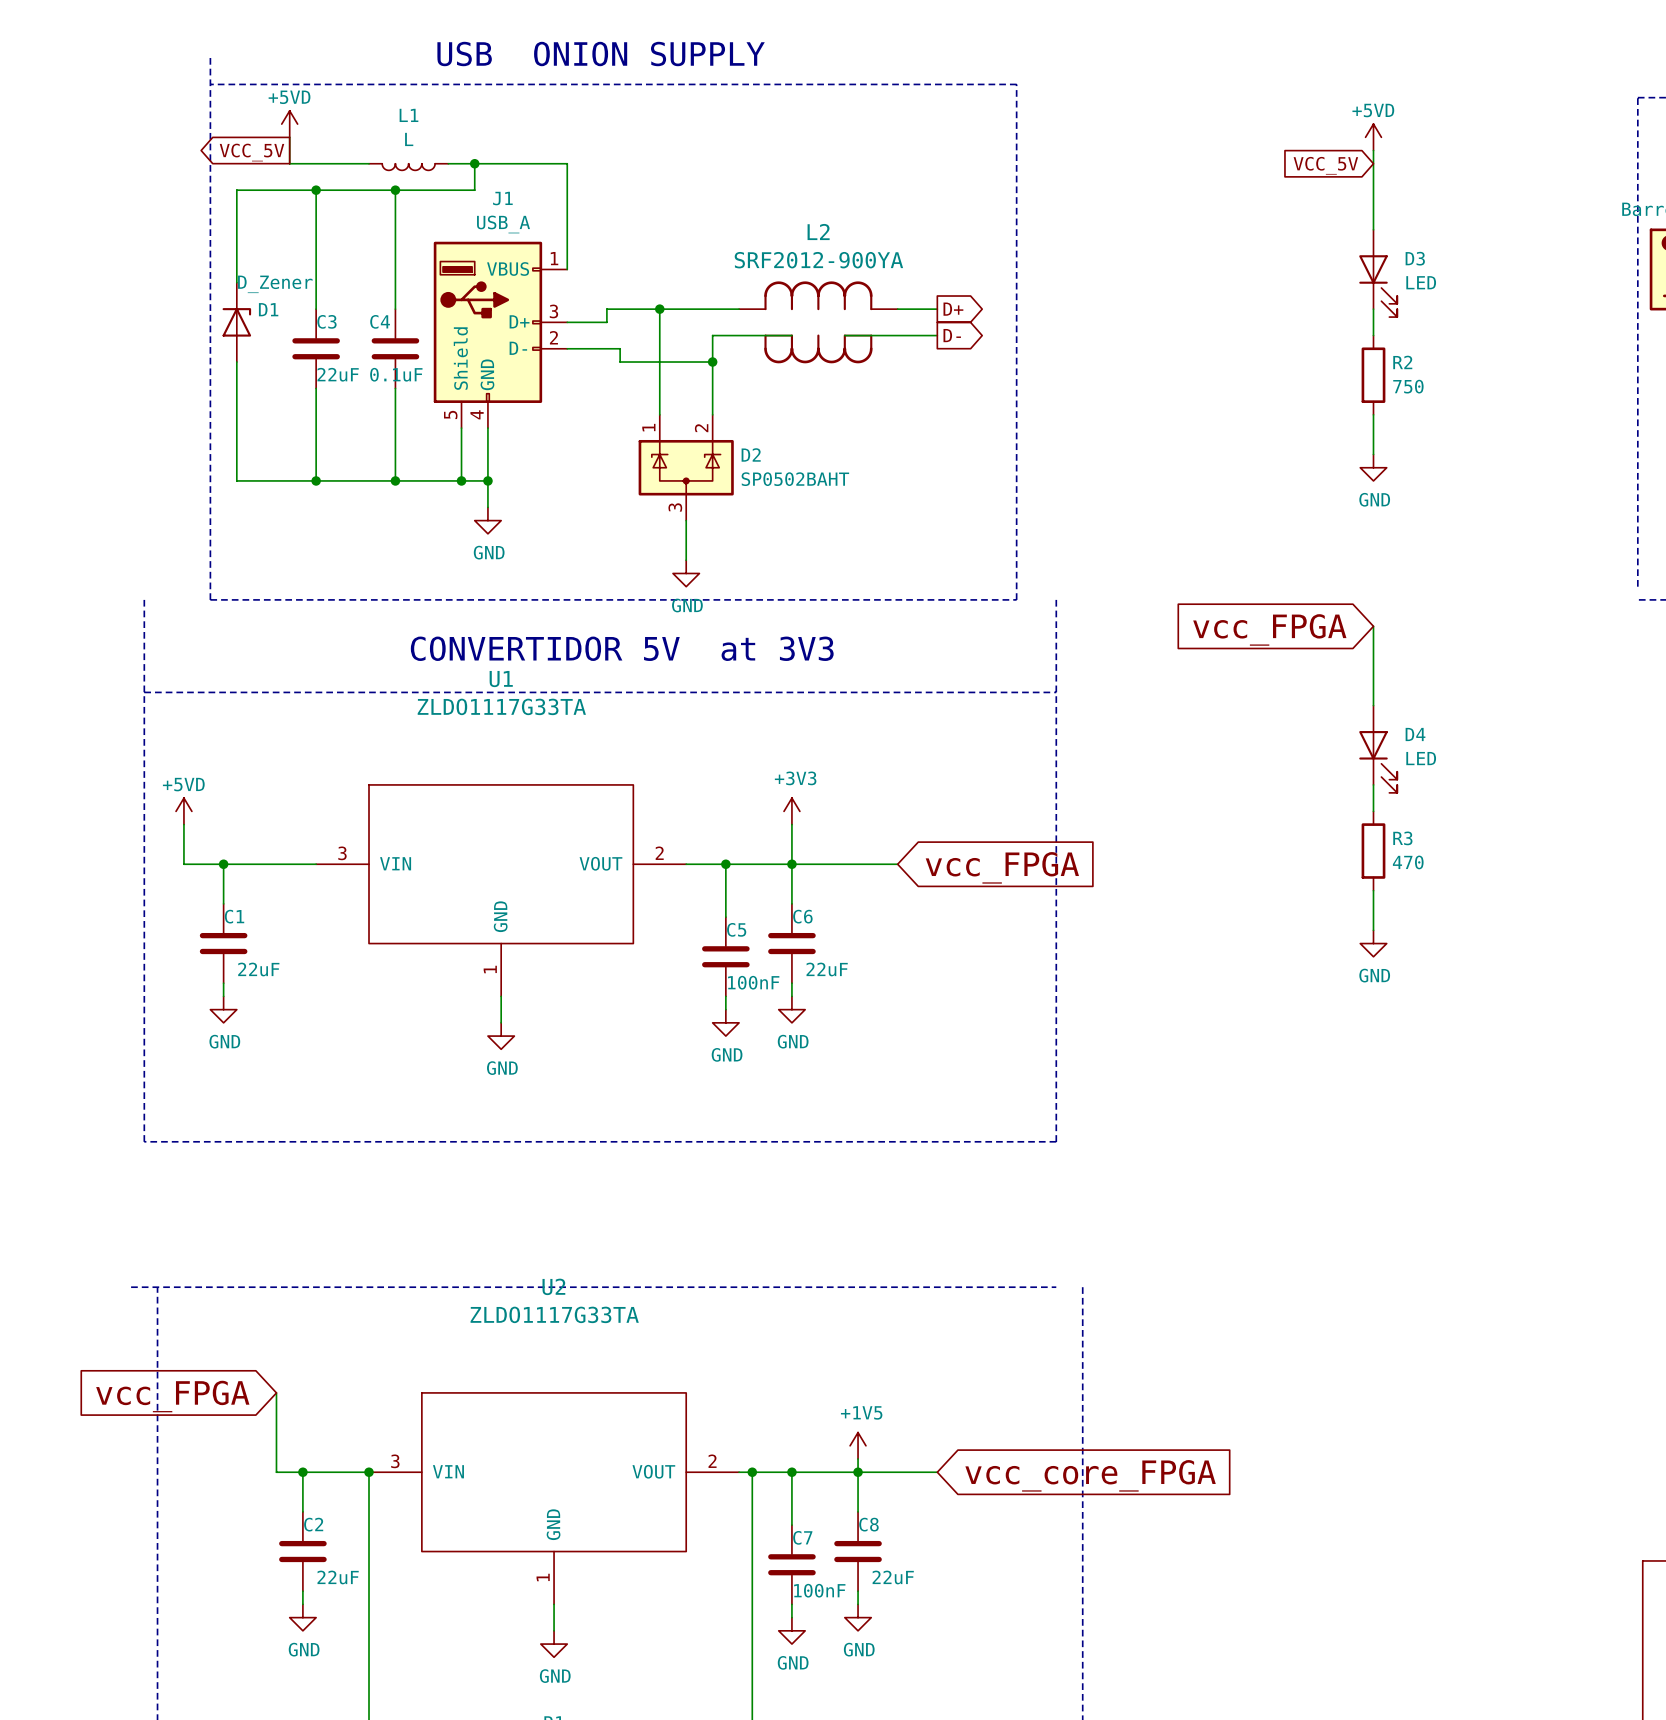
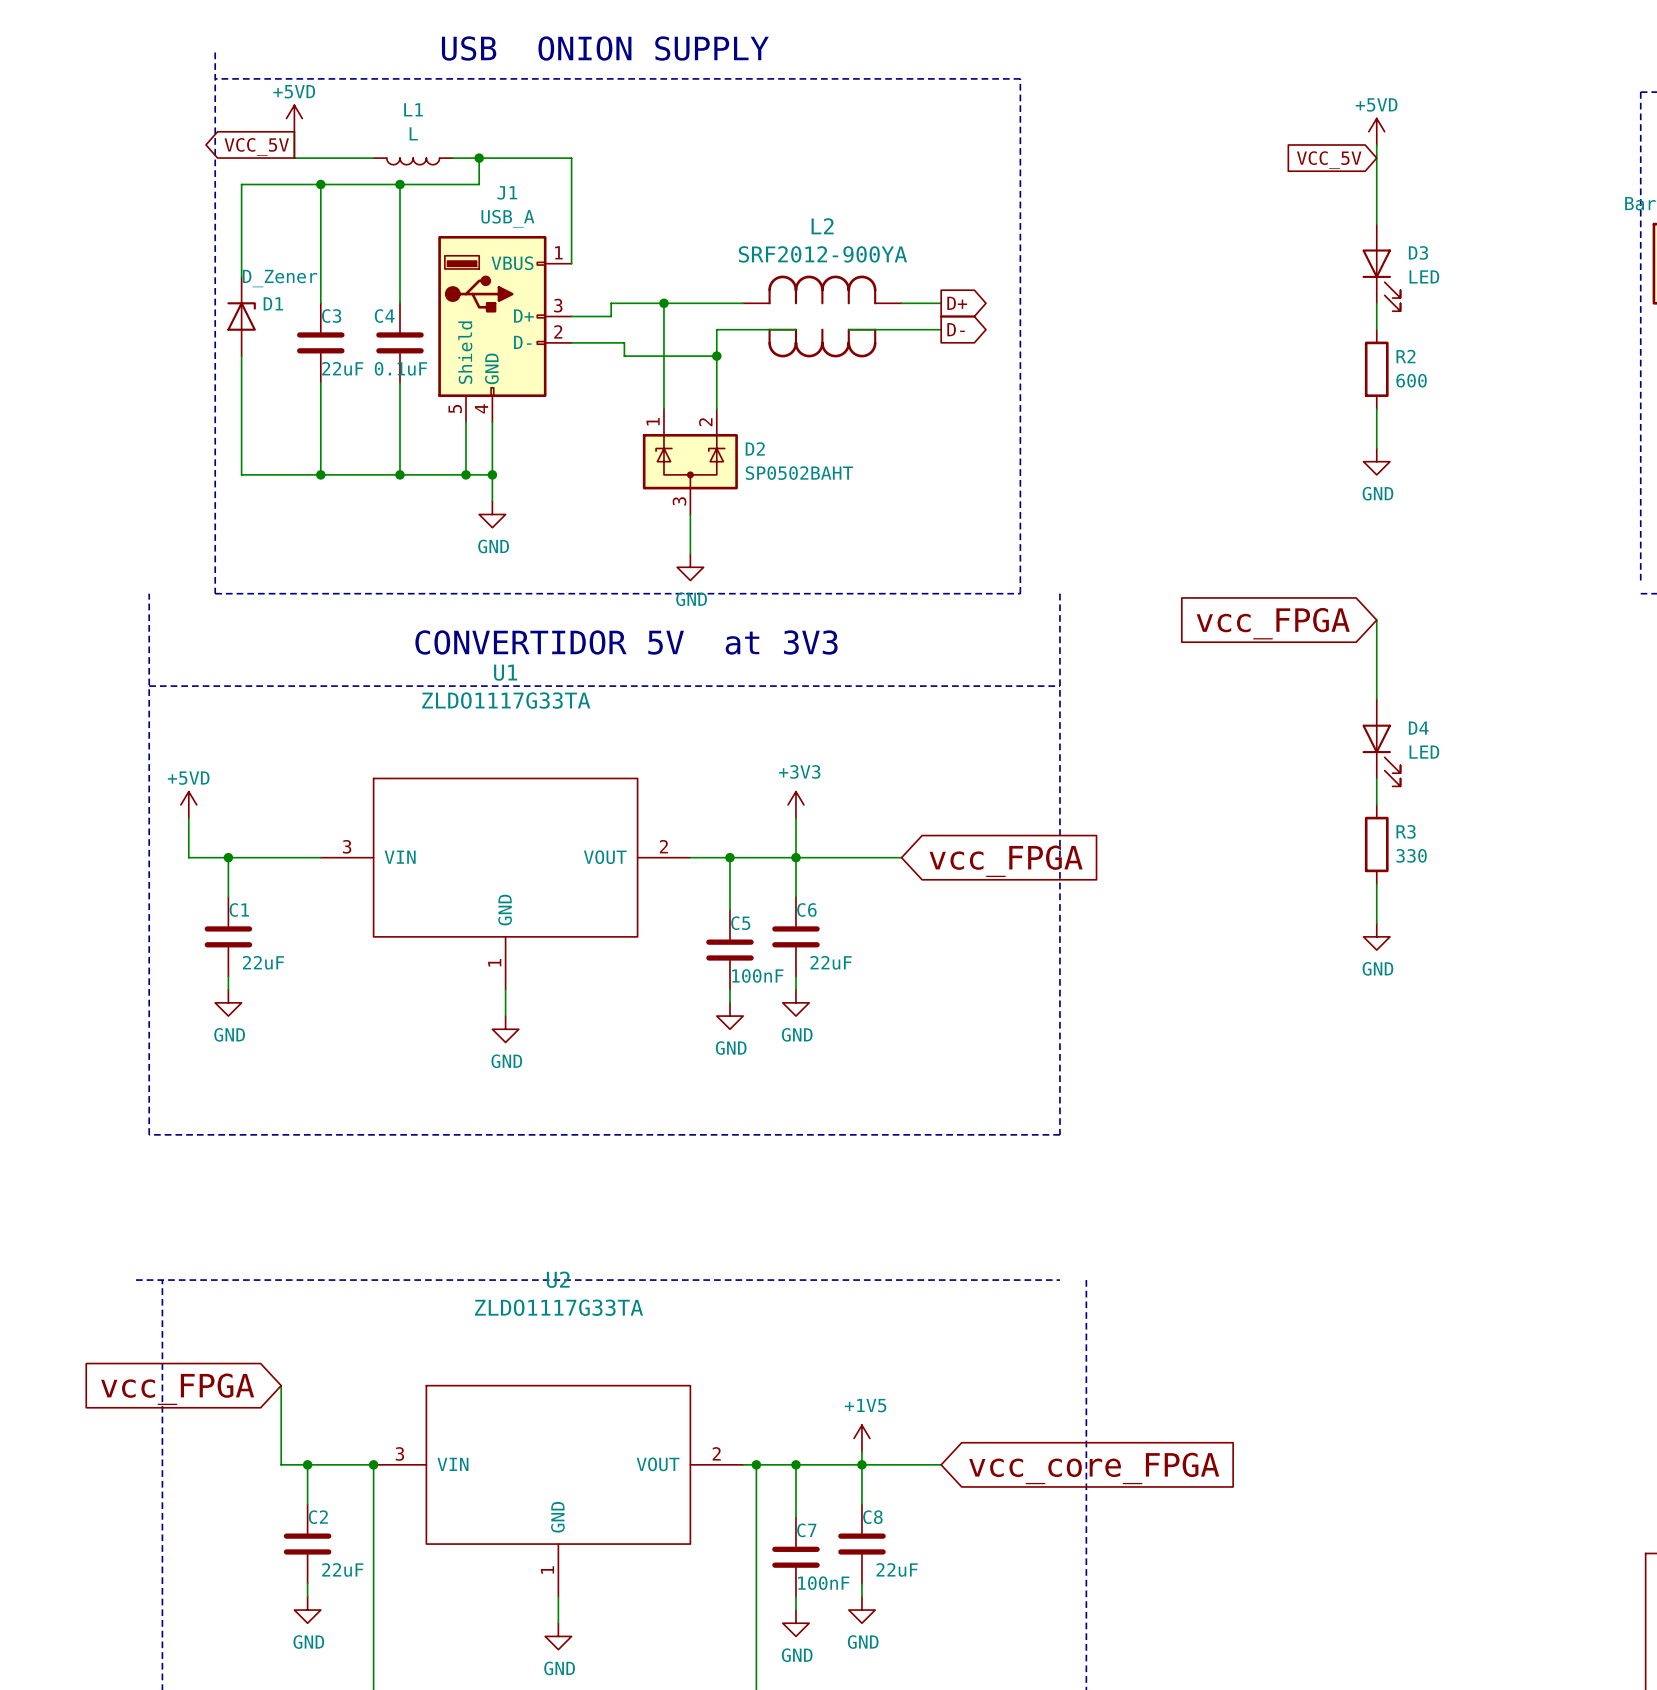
R2 value: 750 (1408, 386) -> 600 (1411, 380)
R3 value: 470 (1408, 862) -> 330 (1411, 855)

